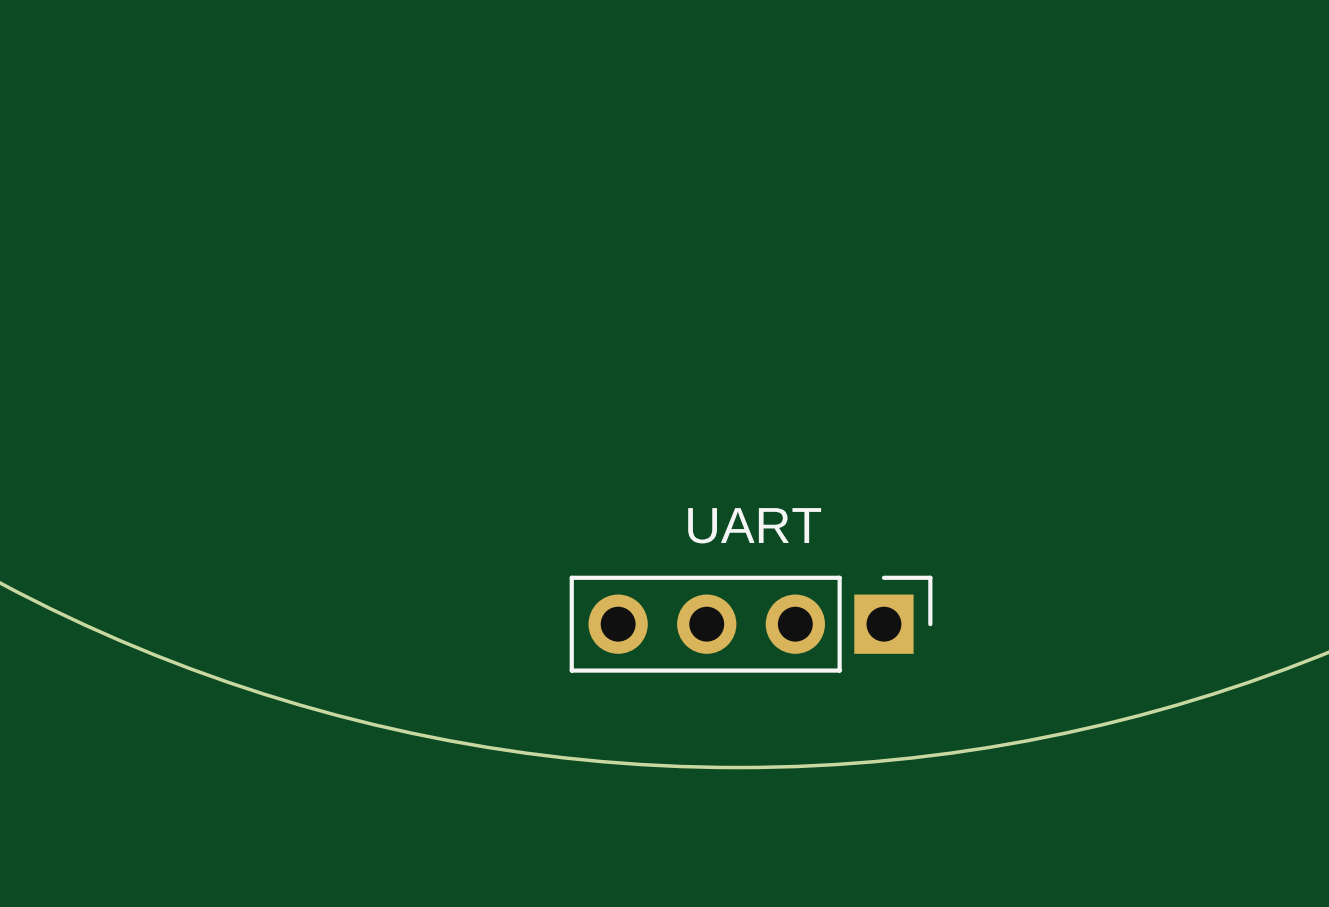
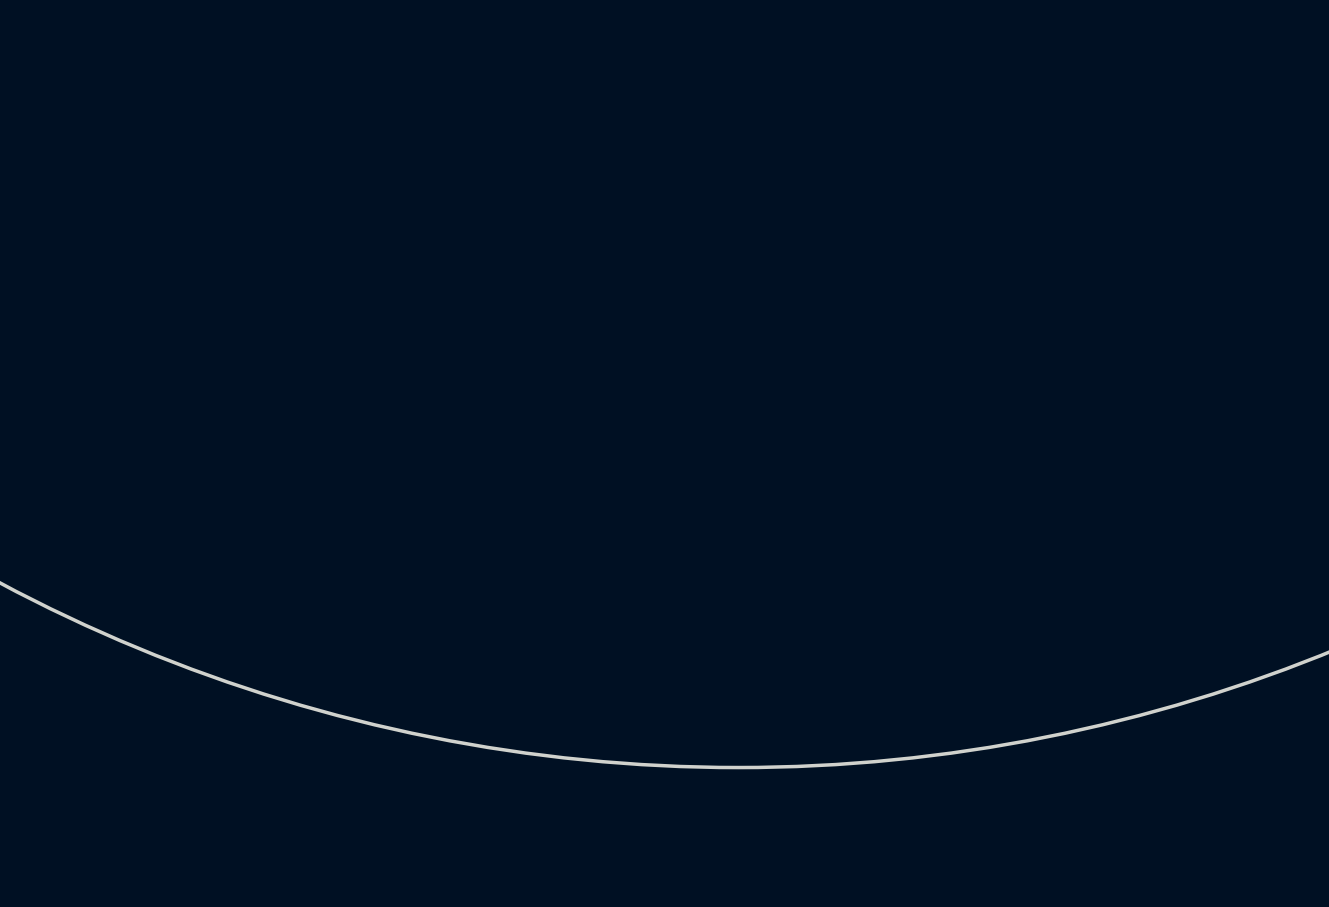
part: UART (751, 624) -> none

